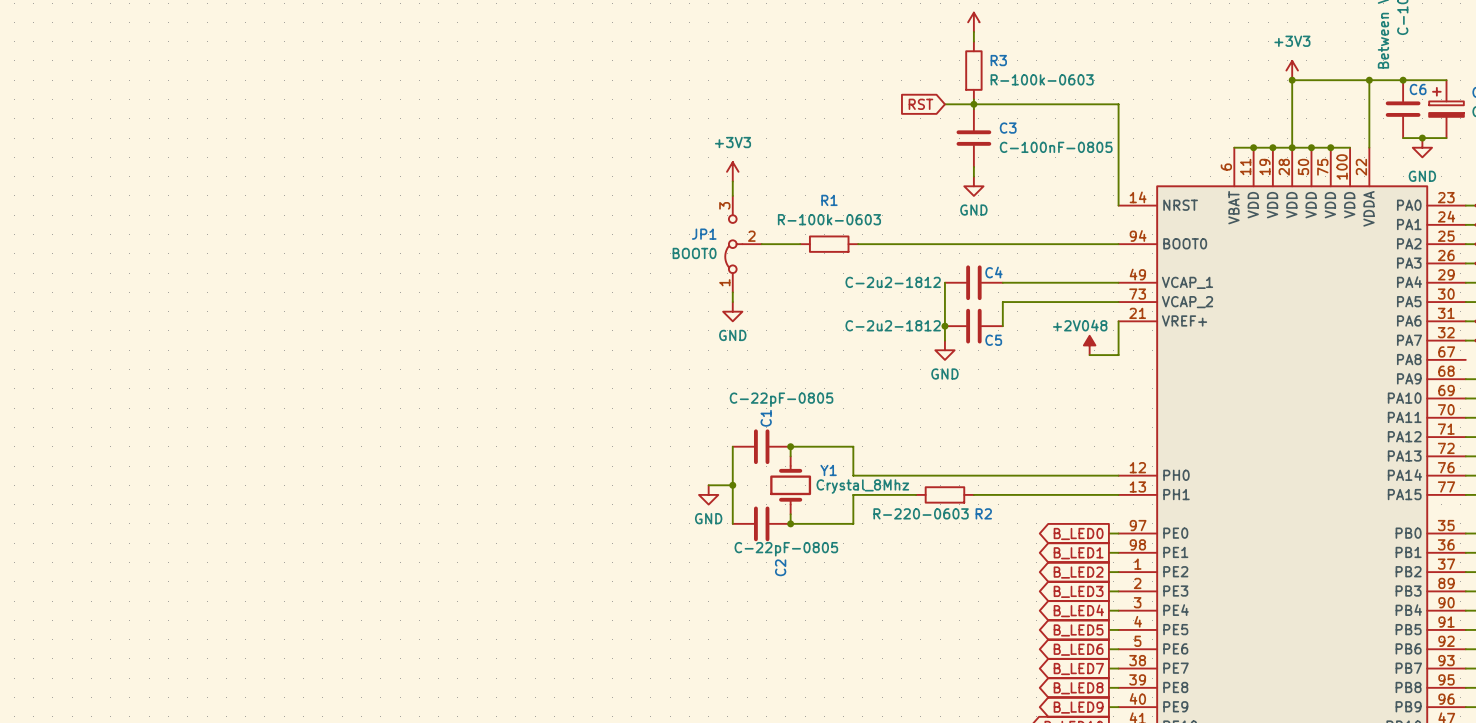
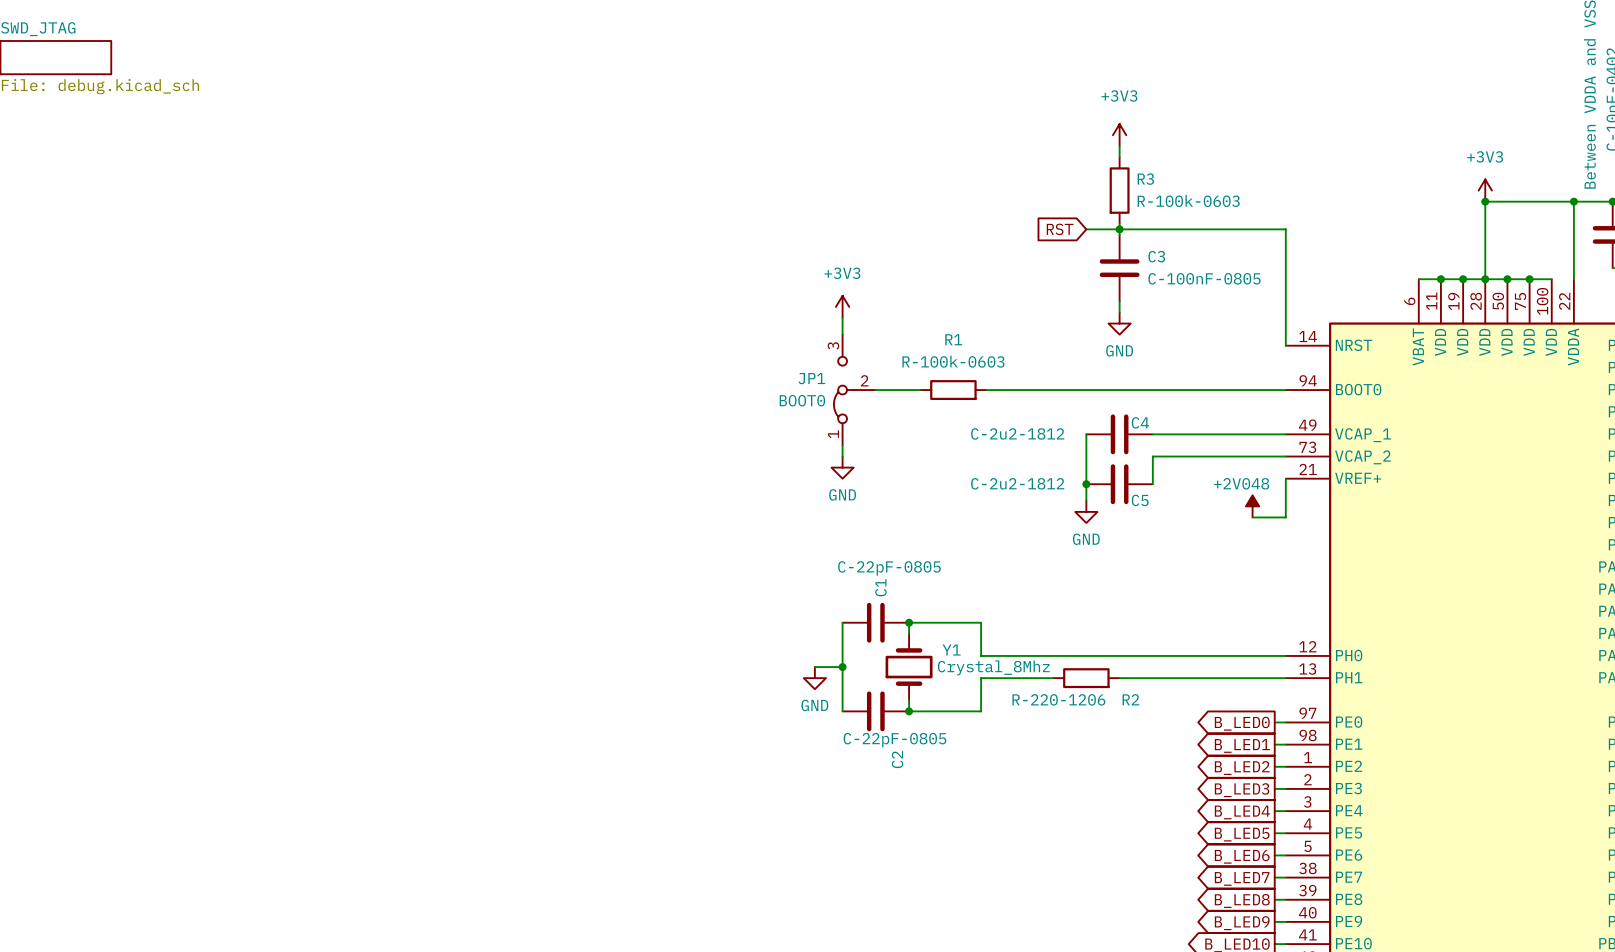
R2 value: R-220-0603 (921, 513) -> R-220-1206 (1058, 699)

